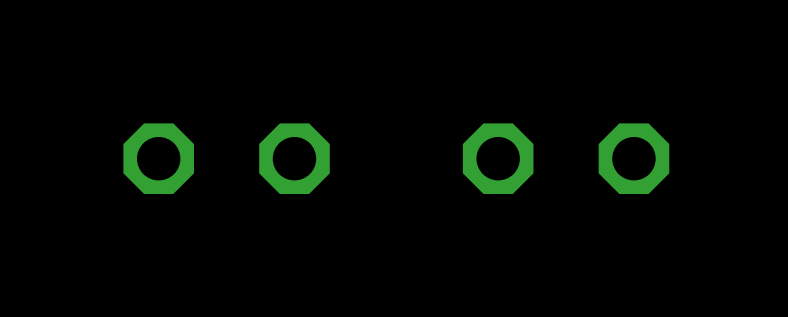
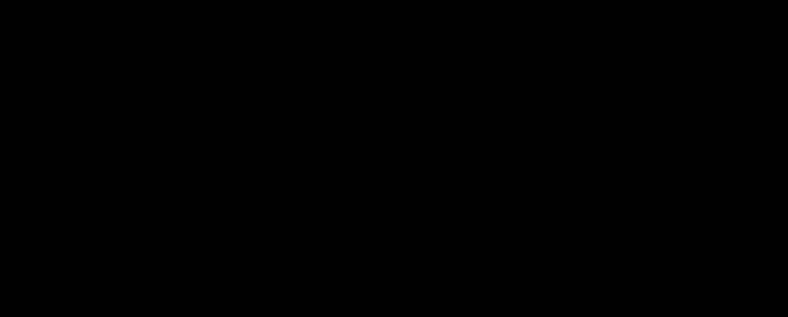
part: (226, 158) -> none
part: (566, 158) -> none

